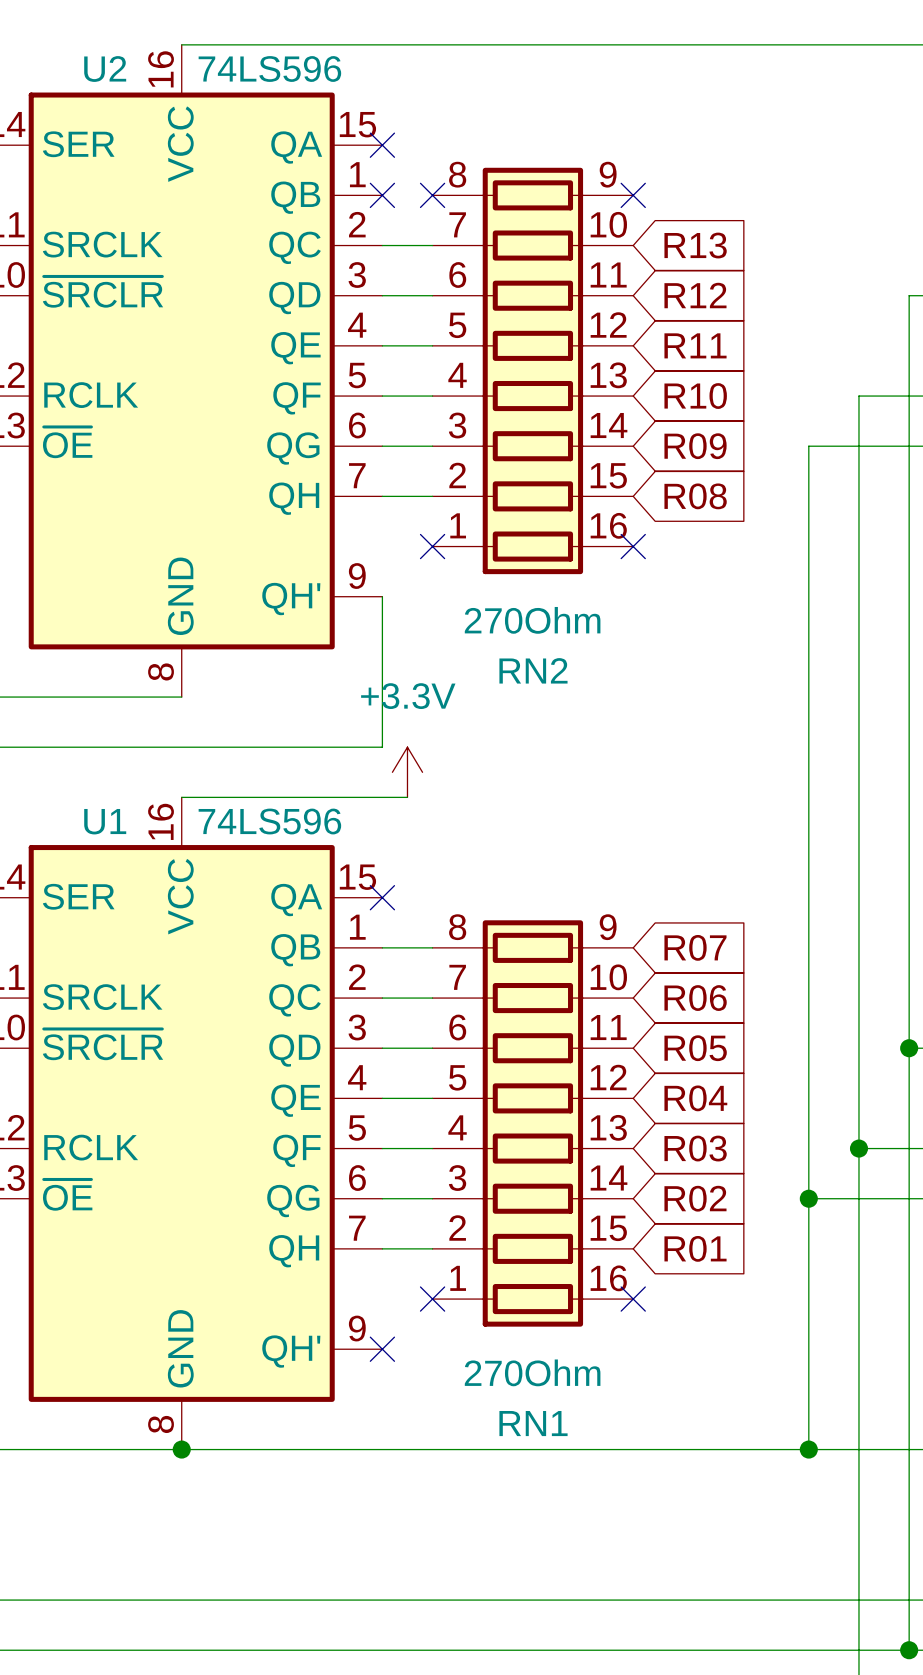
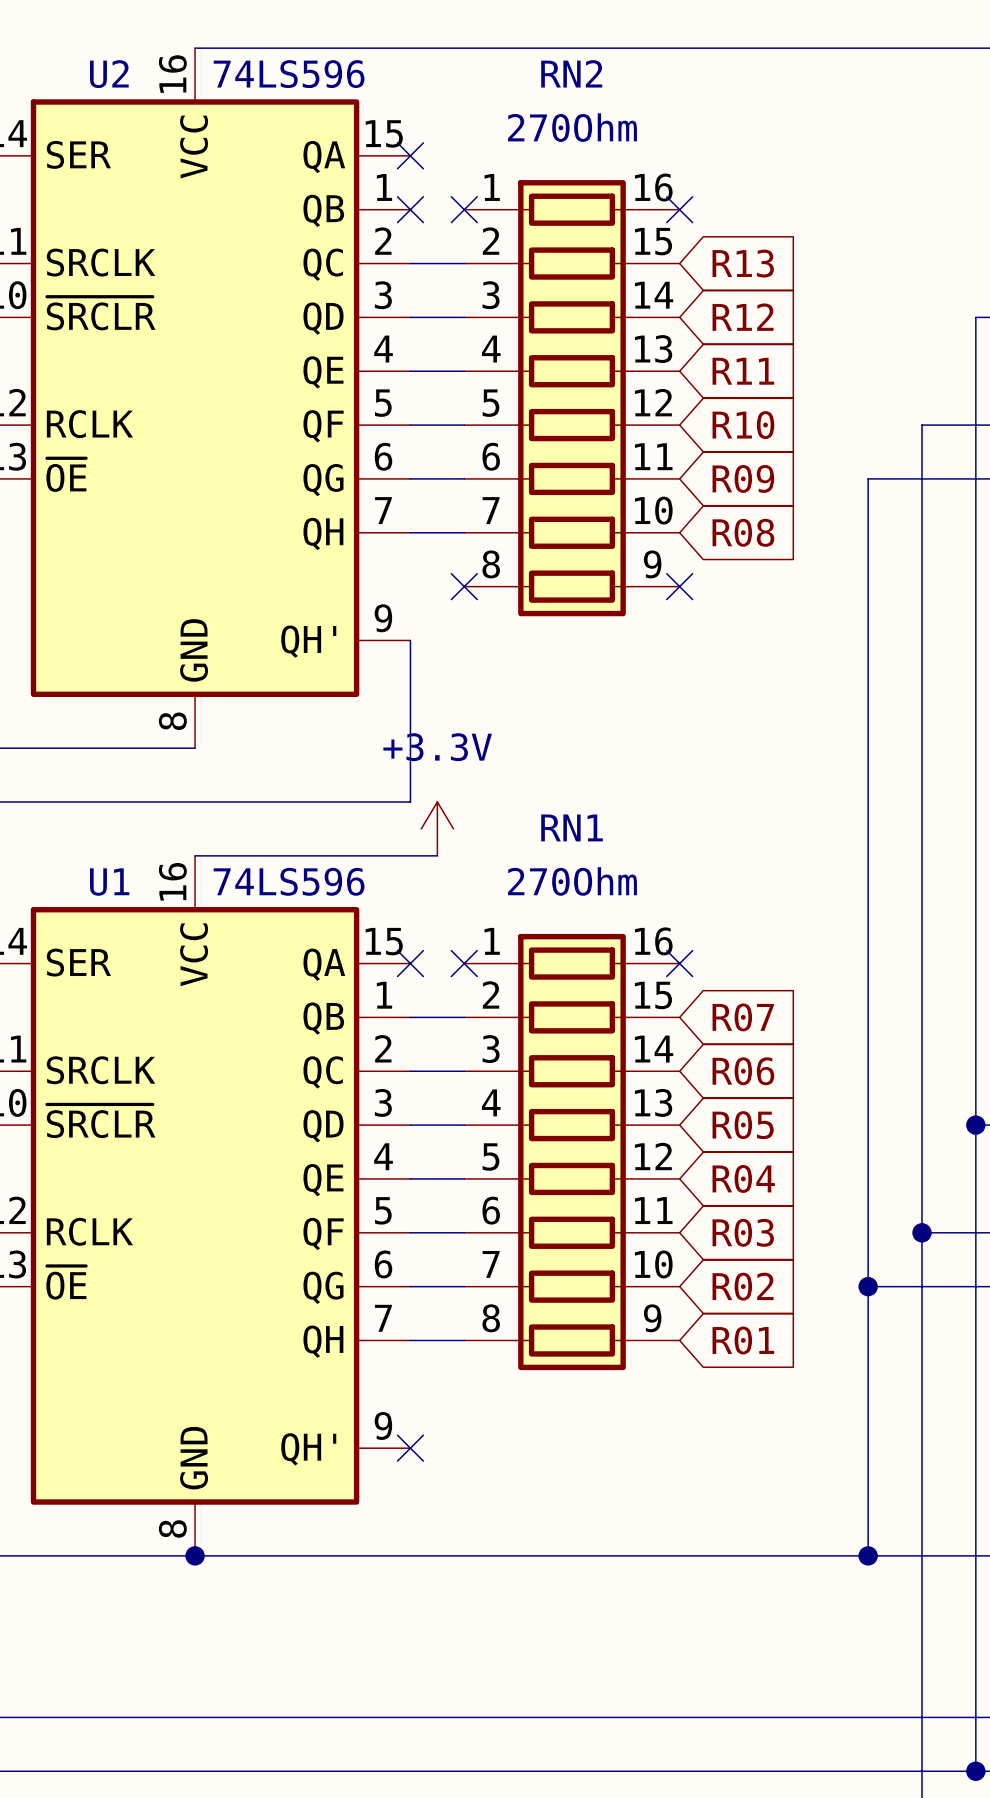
RN2 flip: as is (532, 370) -> up-down (571, 398)
no-connect mark: none -> (464, 963)
no-connect mark: none -> (679, 963)
RN1 flip: as is (532, 1123) -> up-down (571, 1152)
no-connect mark: (432, 1299) -> none
no-connect mark: (633, 1299) -> none

